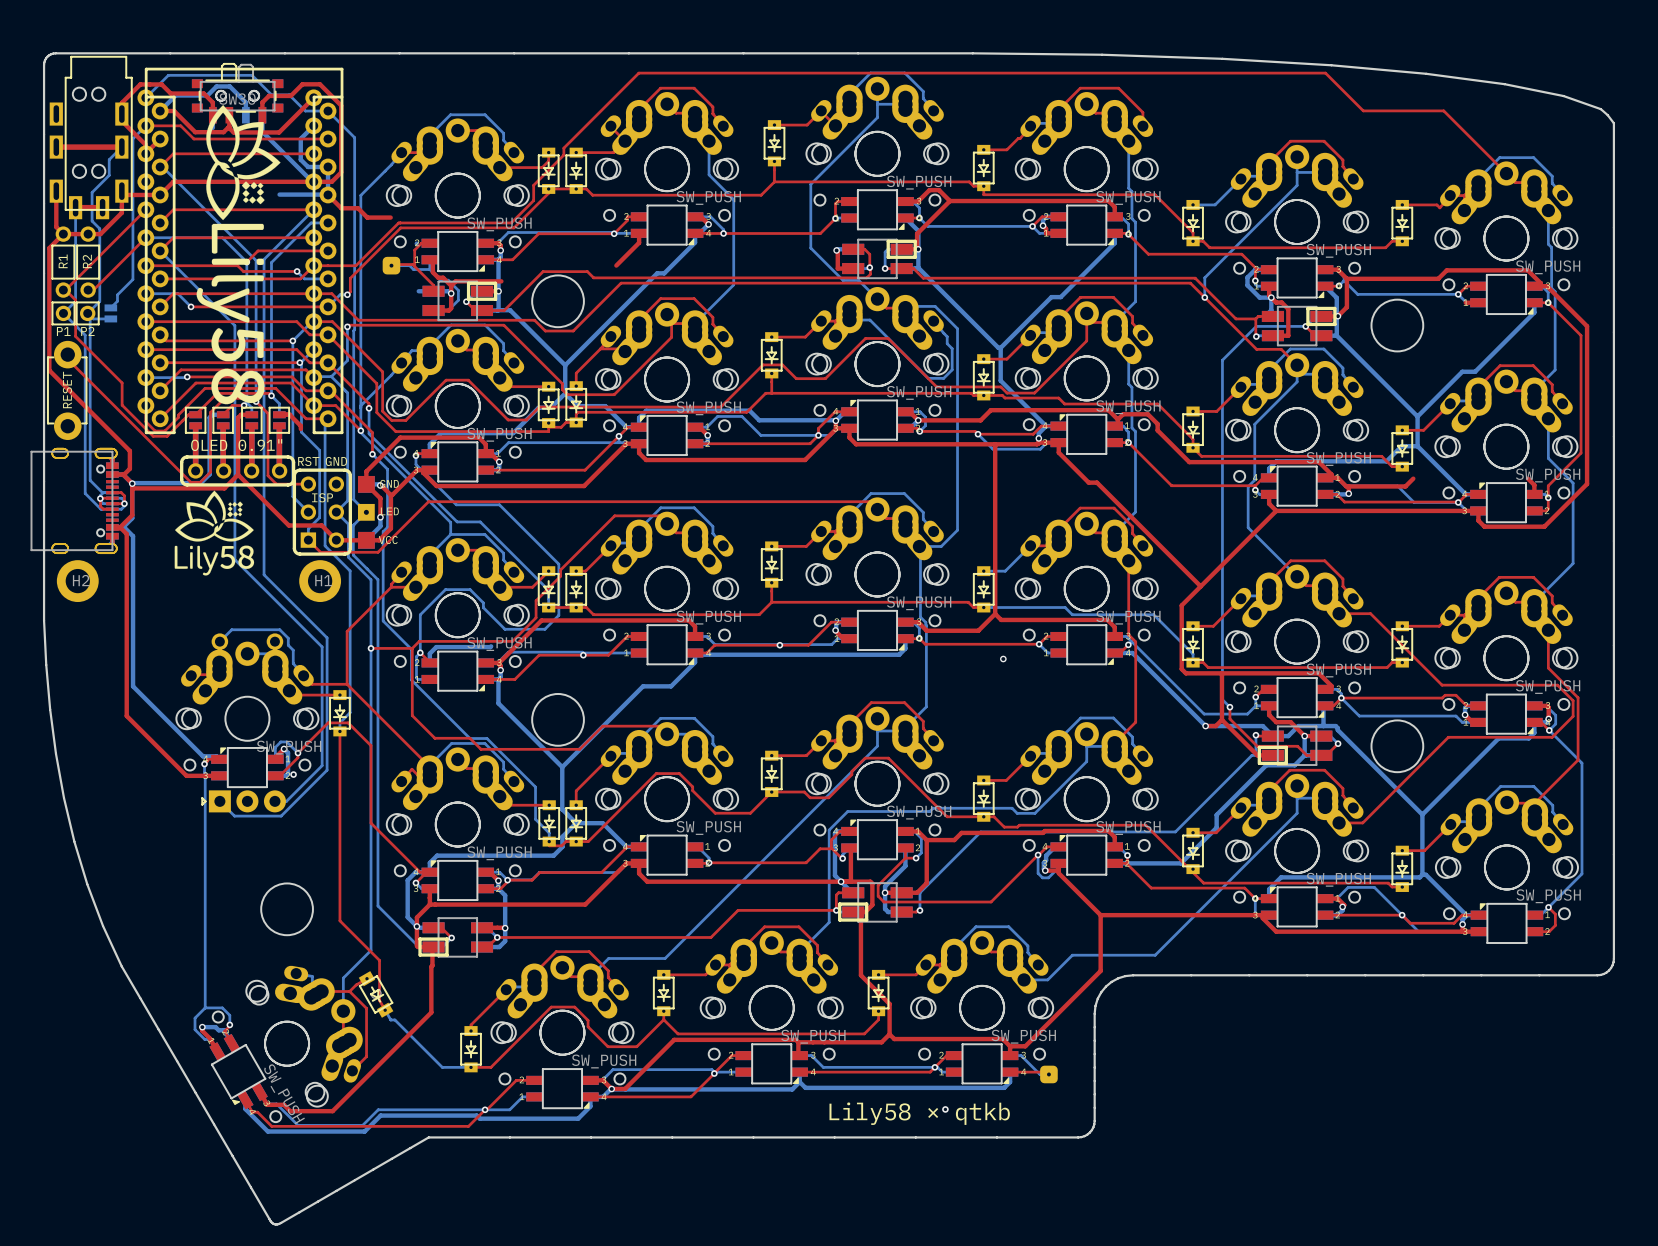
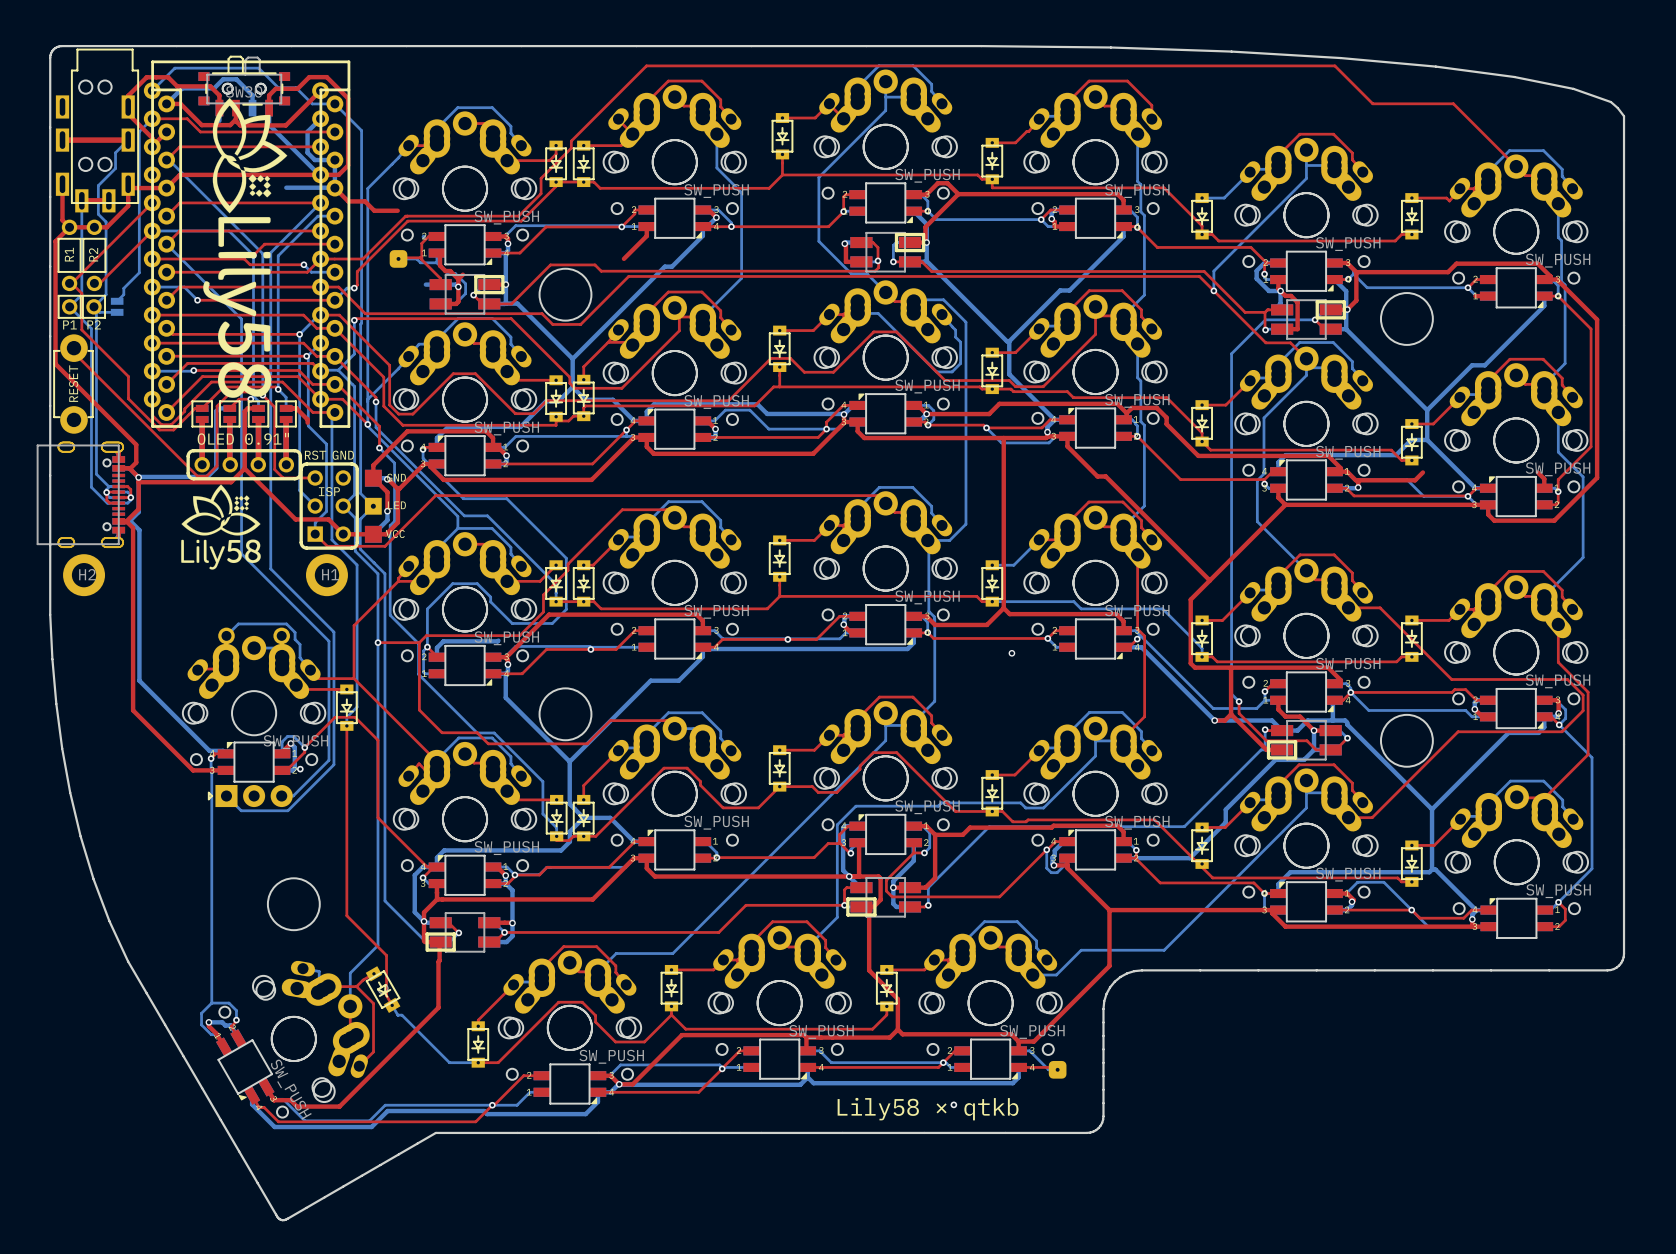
top track: (455, 281) (501, 281) -> none

